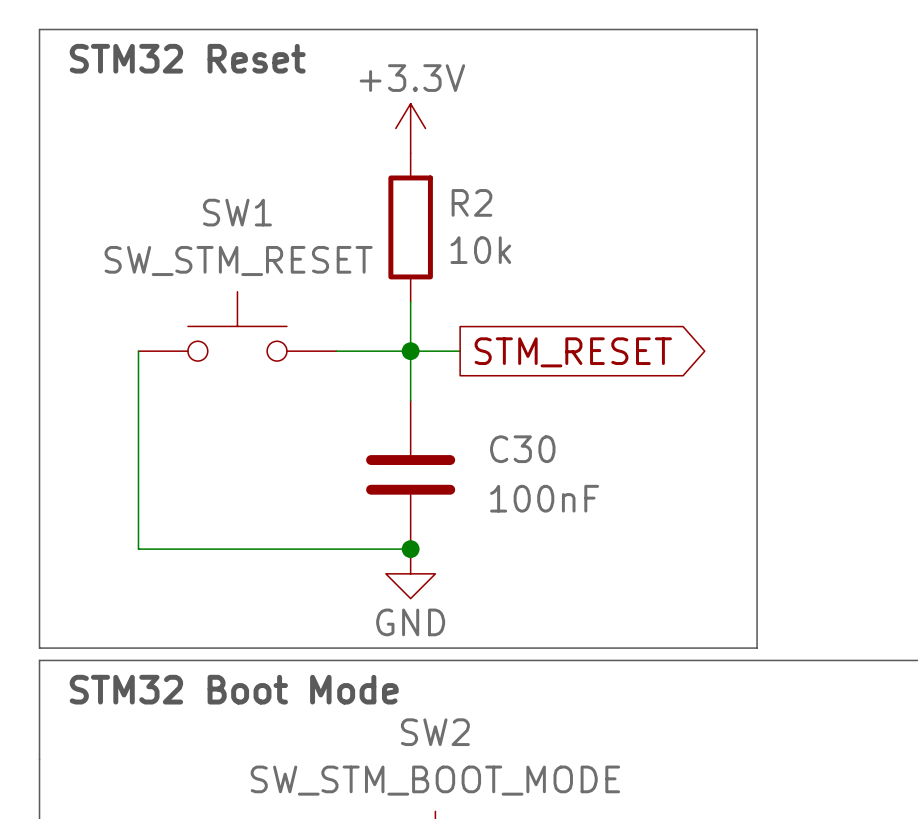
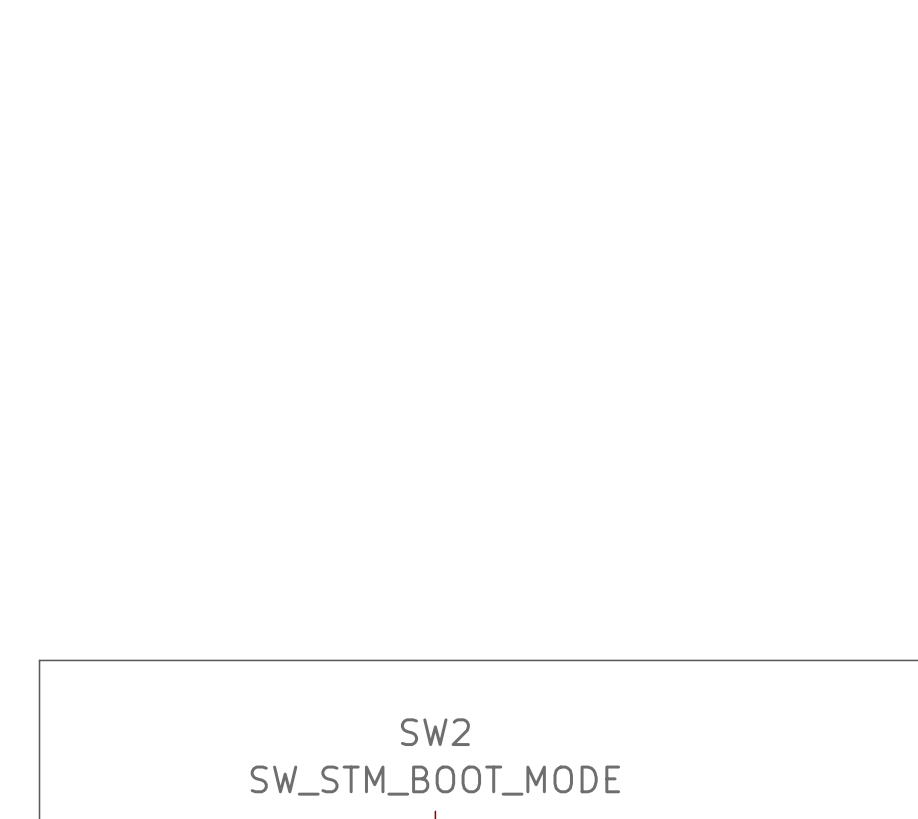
line: (39, 29) (39, 648) (757, 648) (757, 29) (39, 29) -> none
text: STM32 Reset (187, 58) -> none
power symbol: +3.3V (410, 128) -> none
R2: 10k (410, 227) -> none
wire: (410, 301) (410, 400) -> none
SW1: SW_STM_RESET (237, 326) -> none
wire: (138, 351) (138, 549) (410, 549) -> none
wire: (336, 351) (460, 351) -> none
junction: (410, 351) -> none
global label: STM_RESET (573, 352) -> none
C30: 100nF (410, 474) -> none
junction: (410, 549) -> none
power symbol: GND (410, 573) -> none
text: STM32 Boot Mode (234, 689) -> none

